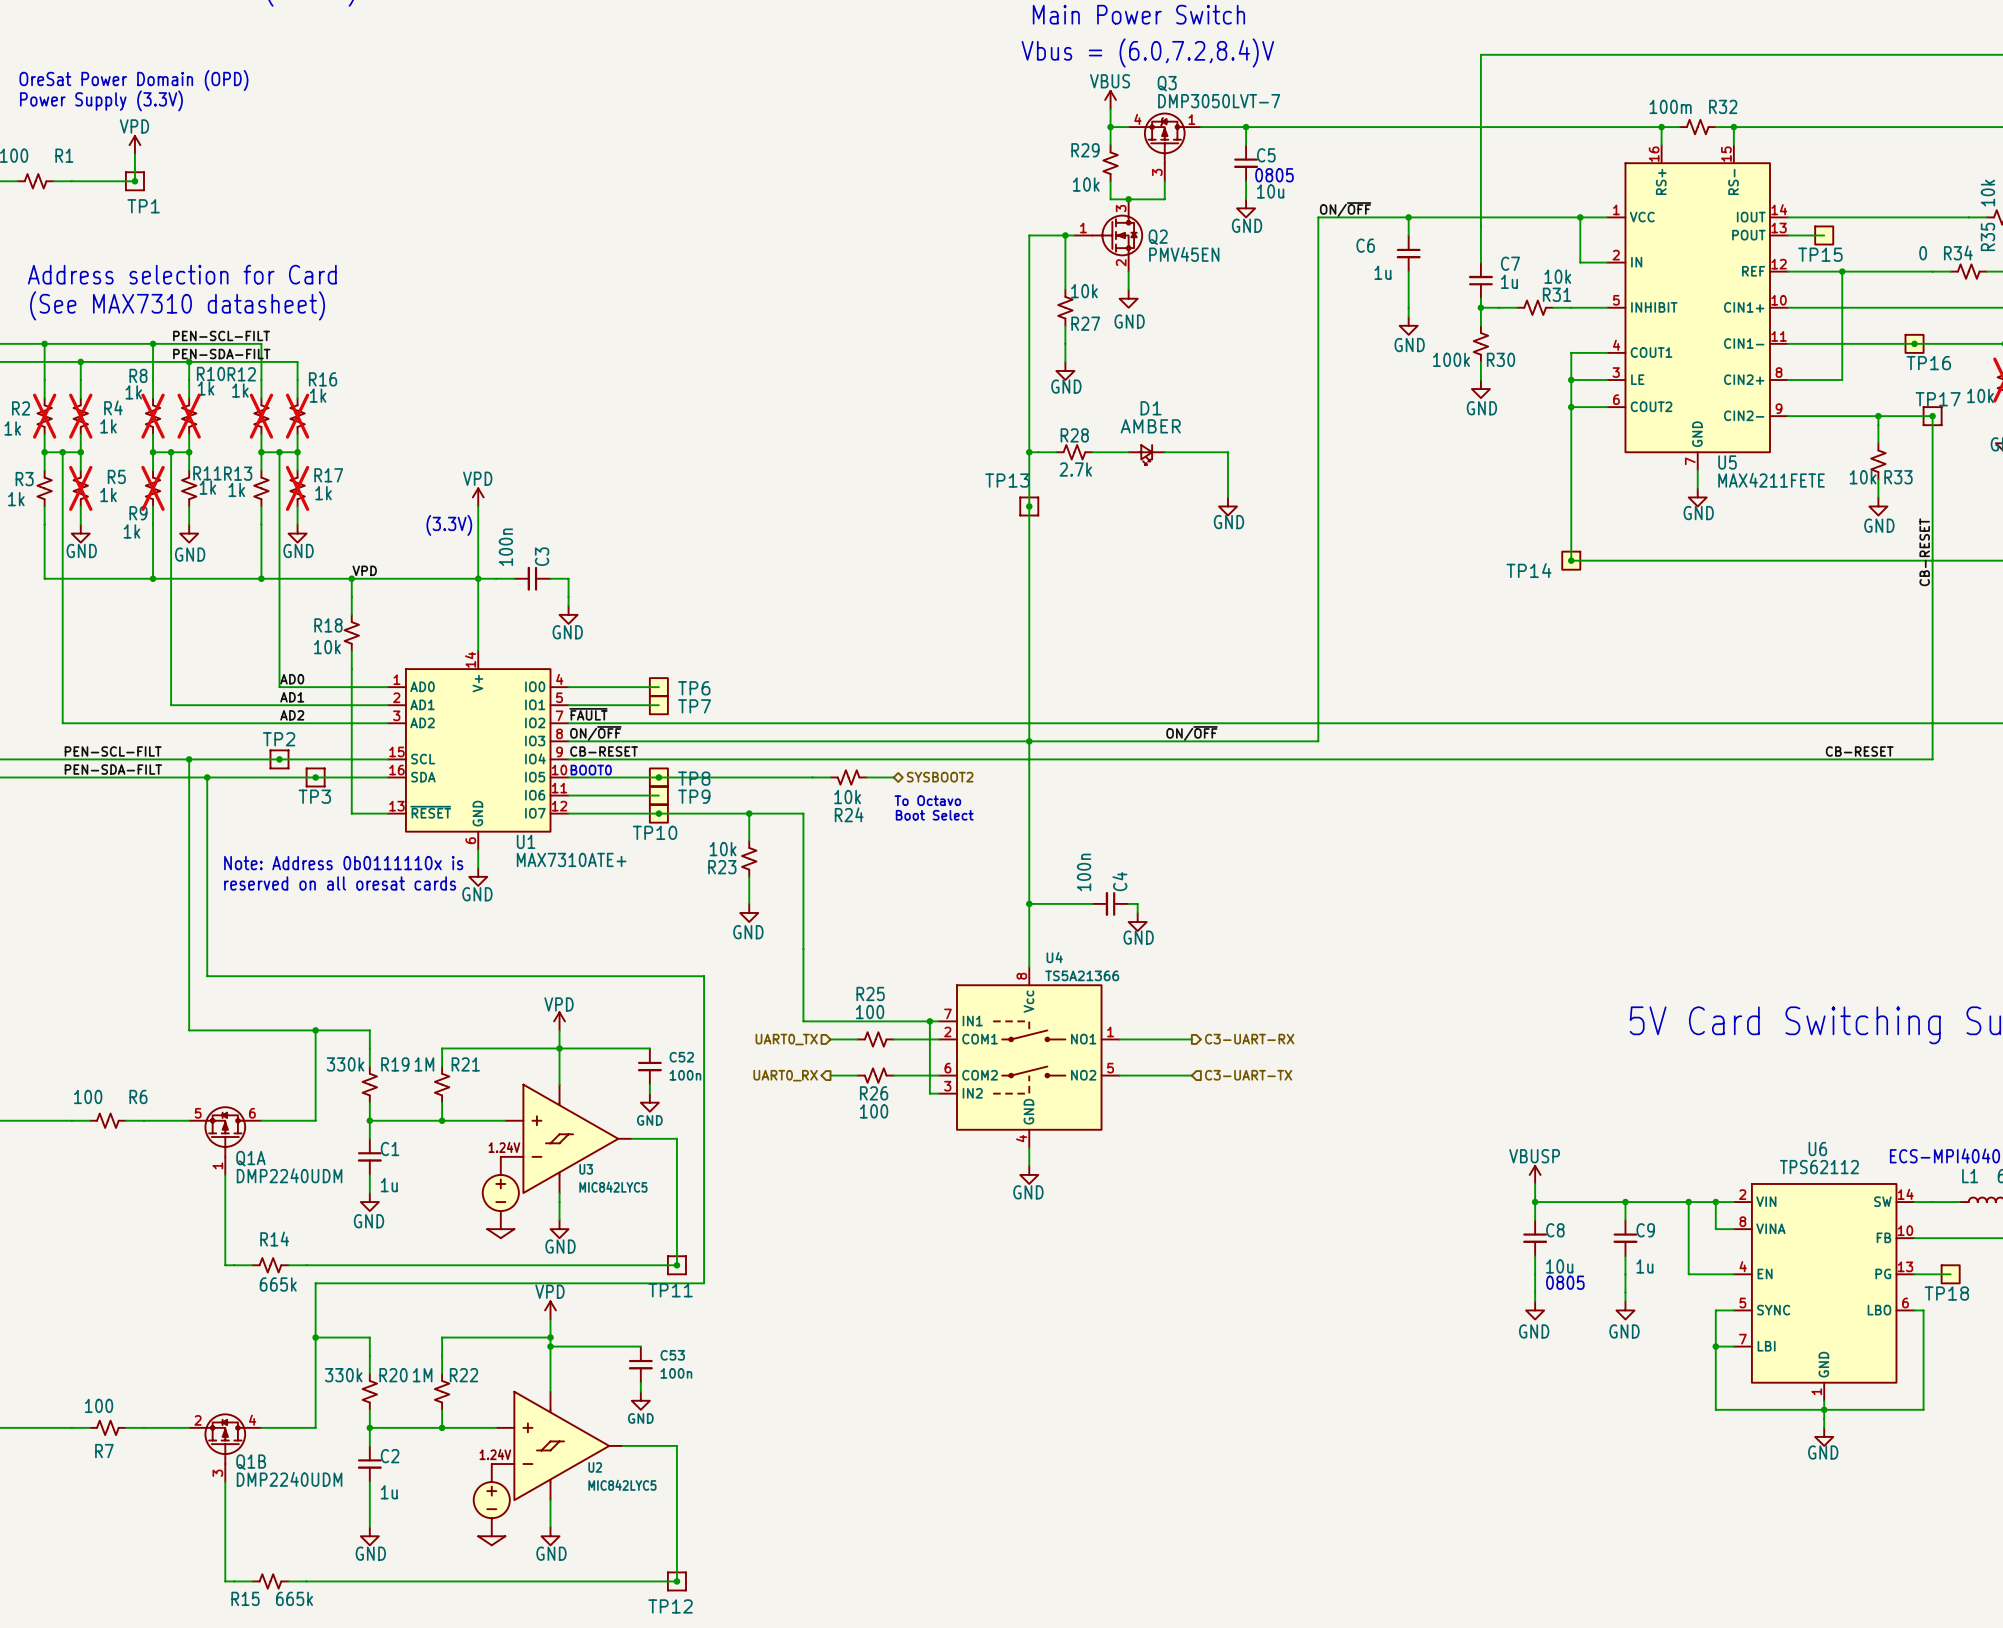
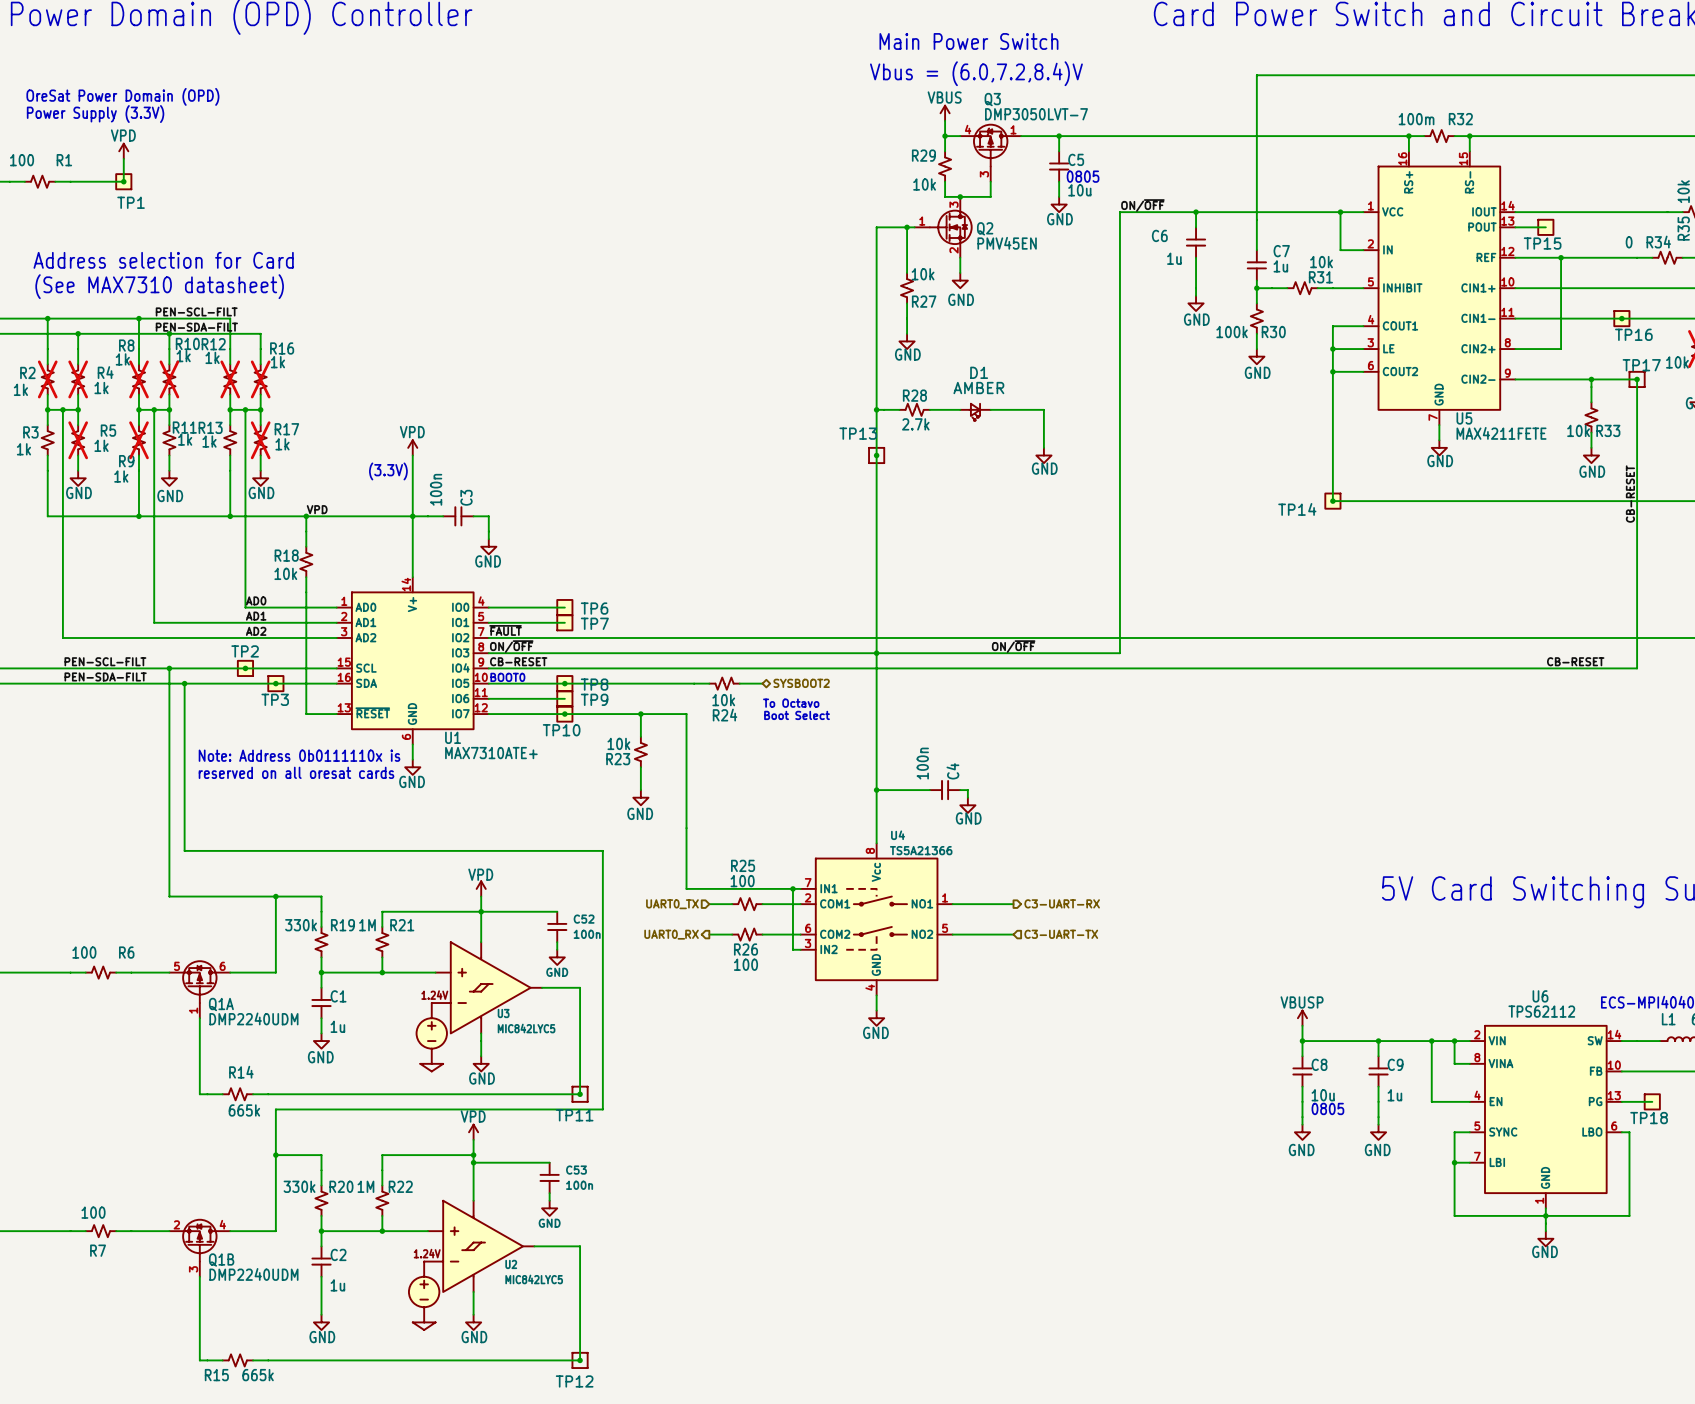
TP1 symbol: [125, 171, 145, 192] -> [116, 174, 132, 190]
TP2 symbol: [269, 749, 290, 770] -> [237, 660, 254, 677]
TP3 symbol: [305, 767, 326, 788] -> [268, 676, 284, 692]

